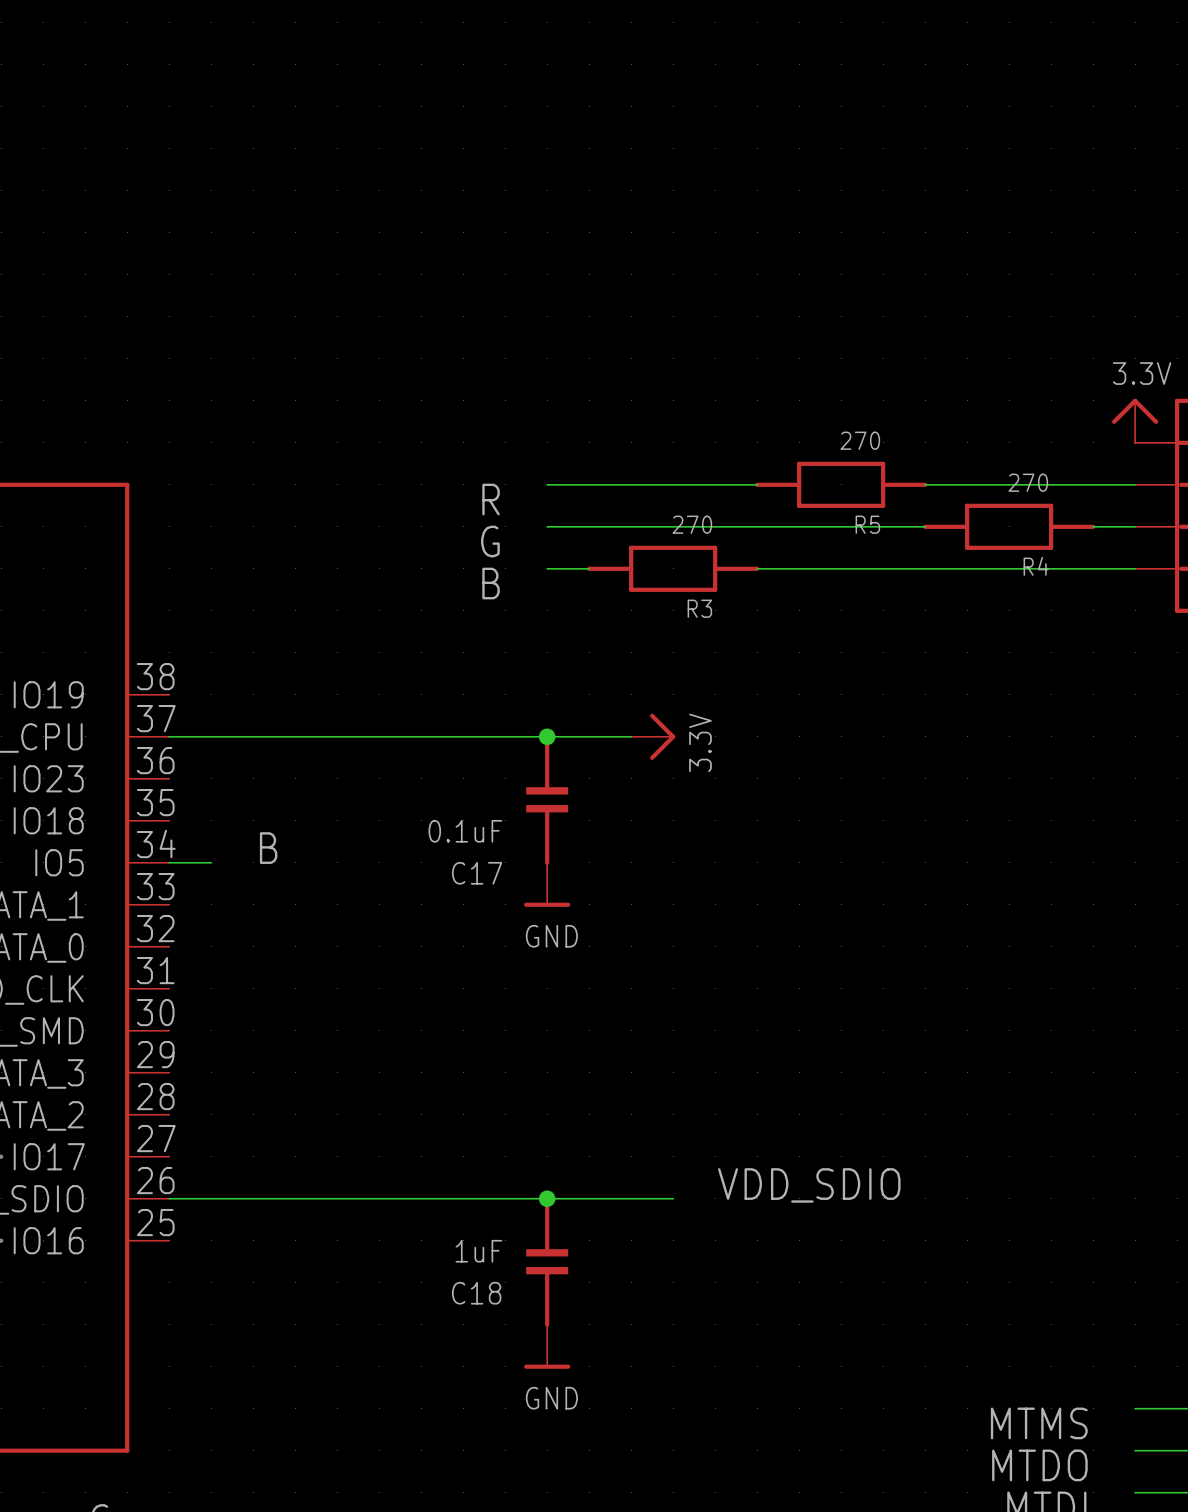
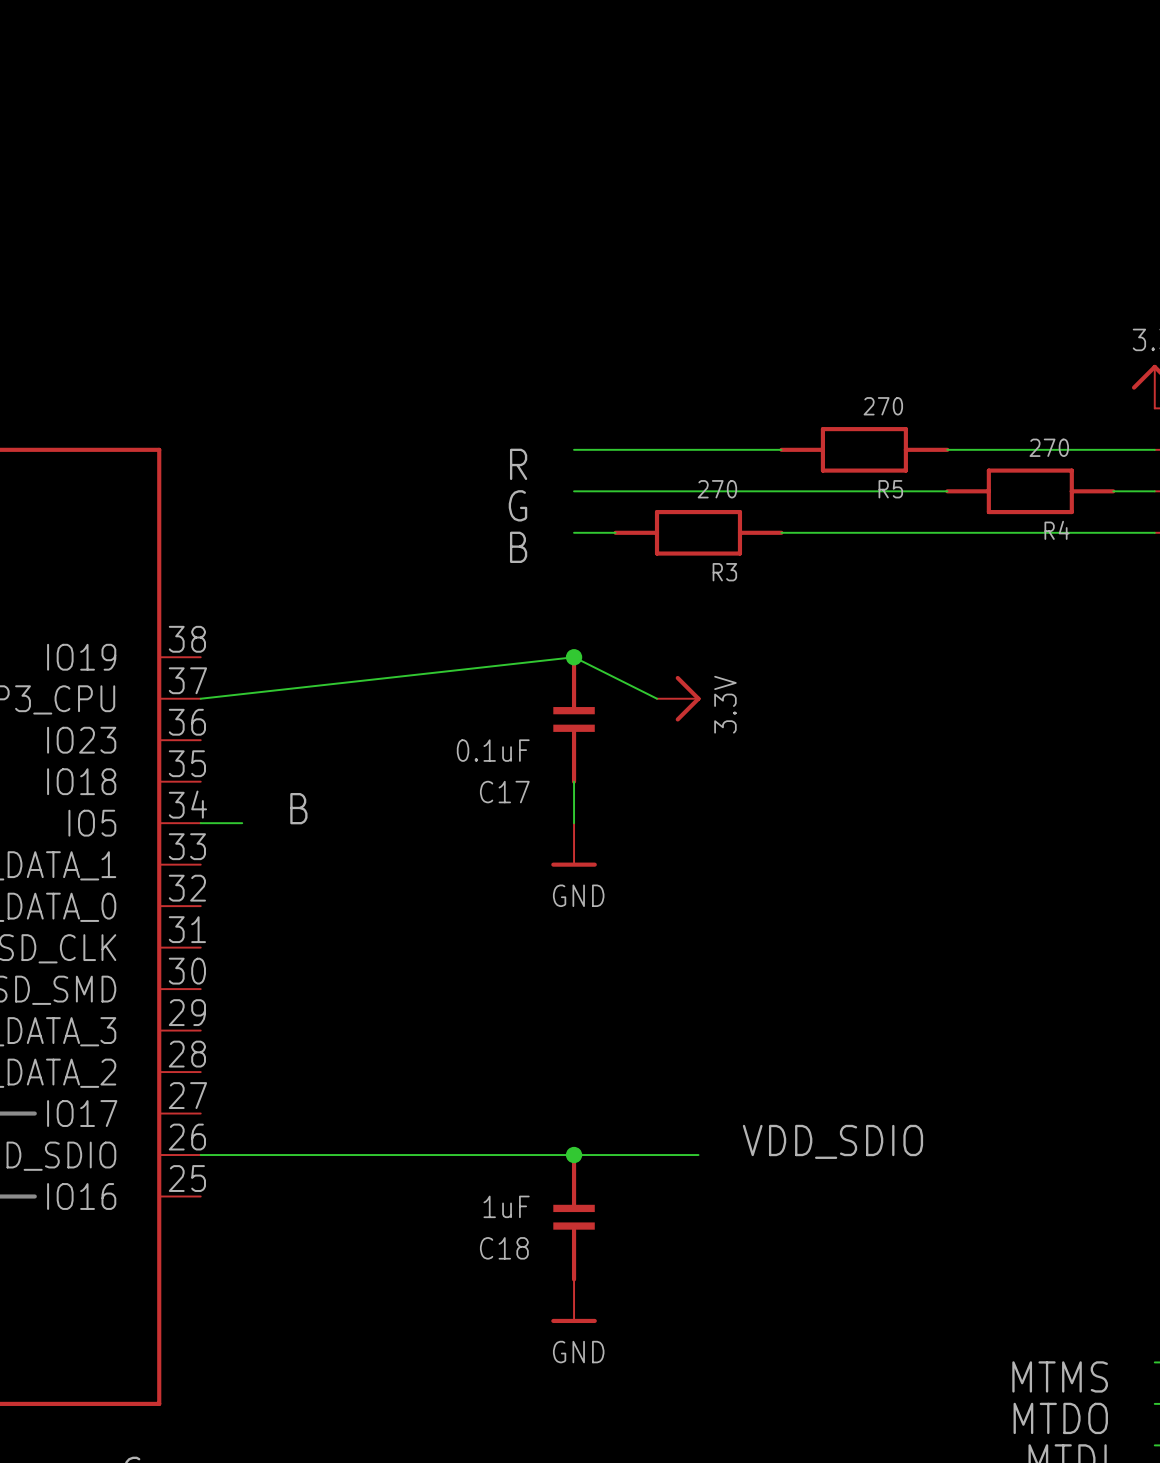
wire: (169, 736) (631, 736) -> (200, 698) (574, 657) (657, 698)
junction position: (547, 736) -> (574, 657)
C17 position: (547, 799) -> (574, 719)

